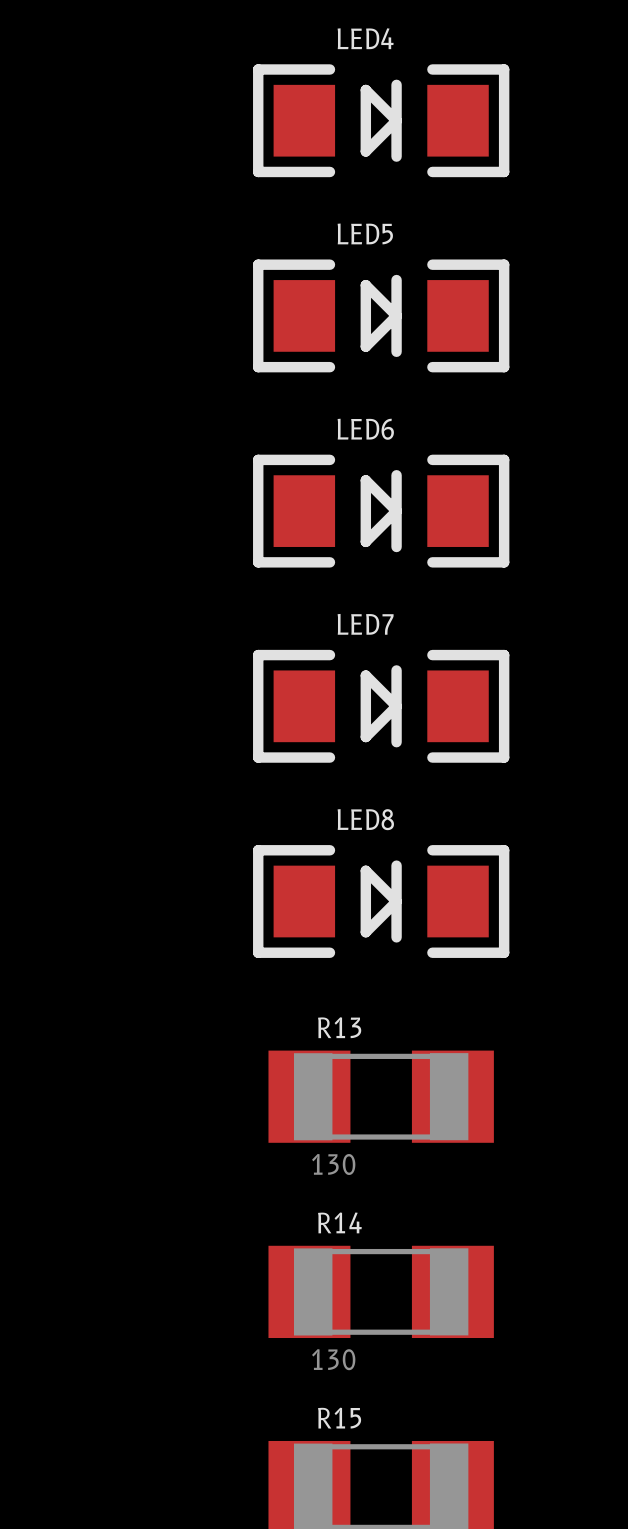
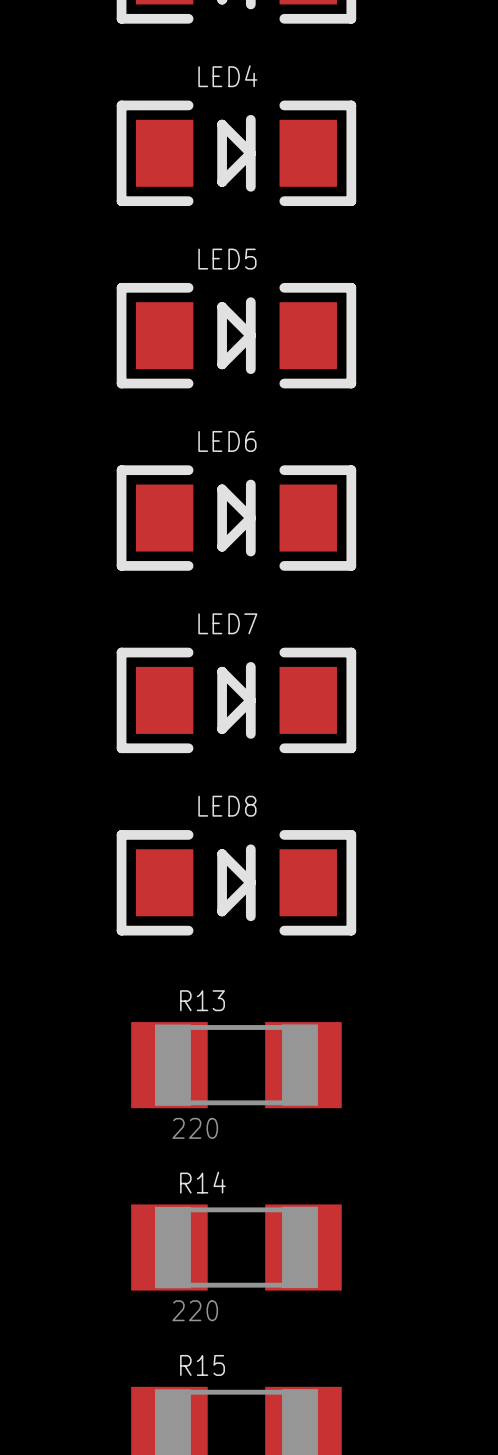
R13 value: 130 (333, 1164) -> 220 (195, 1128)
R14 value: 130 (333, 1359) -> 220 (195, 1310)

